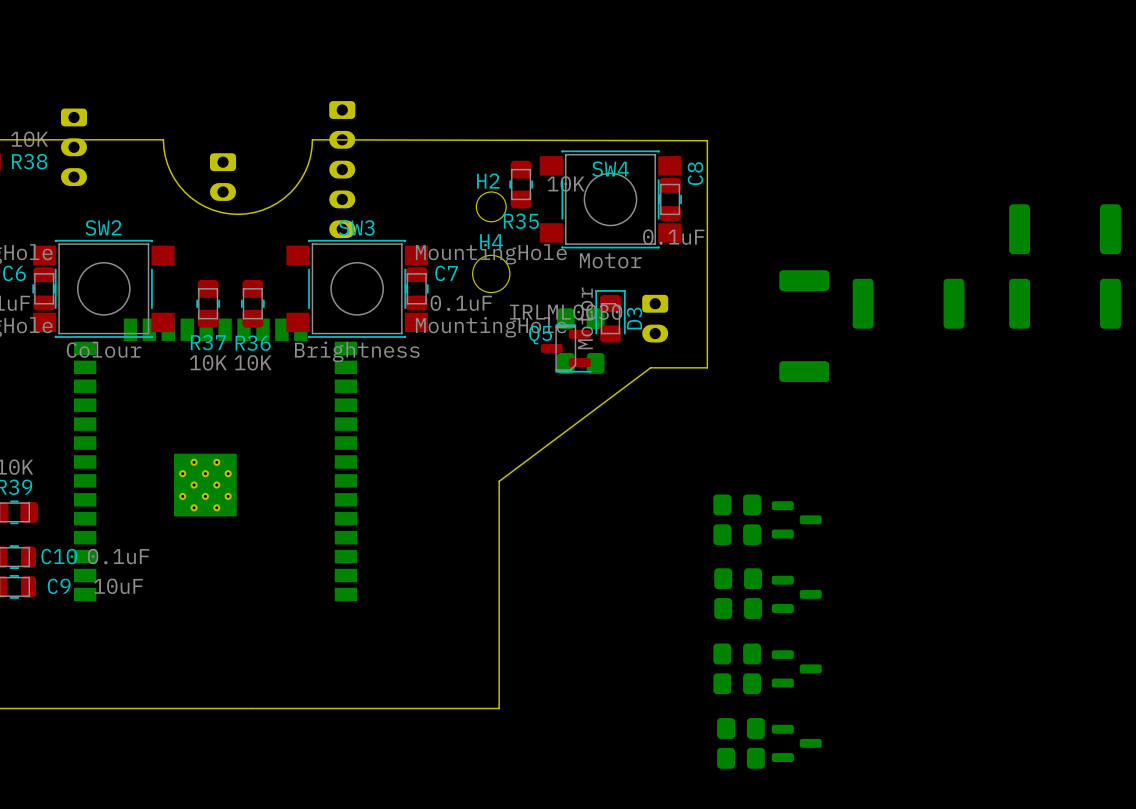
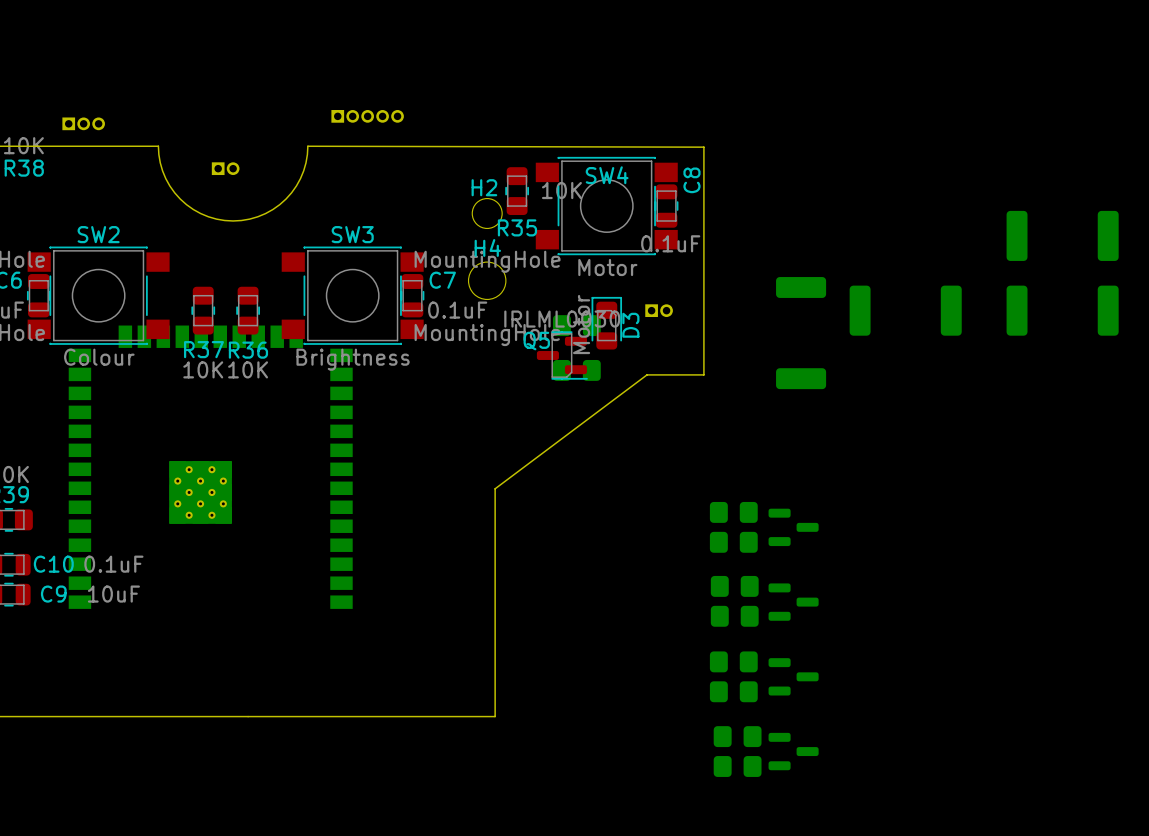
part: none -> (367, 116)
part: none -> (83, 123)
part: (73, 147) -> none
part: none -> (225, 168)
part: (342, 169) -> none
part: (223, 177) -> none
part: none -> (659, 310)
part: (655, 318) -> none

